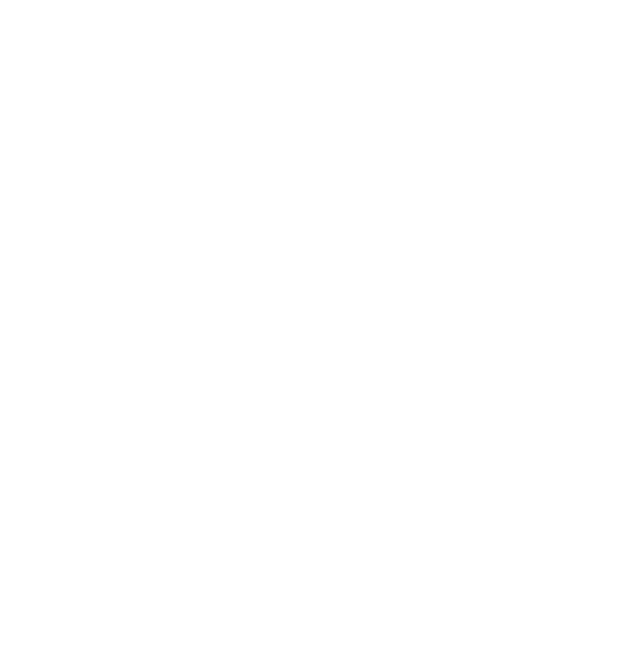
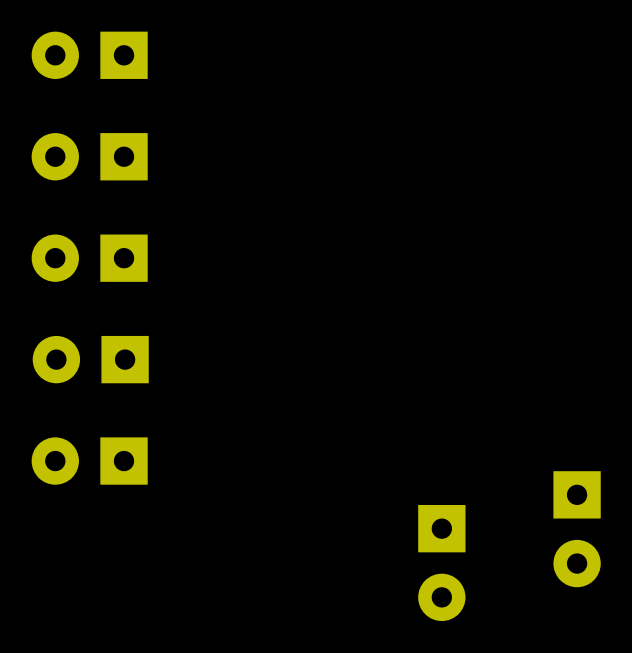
part: none -> (89, 55)
part: none -> (89, 156)
part: none -> (89, 258)
part: none -> (90, 359)
part: none -> (89, 461)
part: none -> (577, 529)
part: none -> (441, 563)

